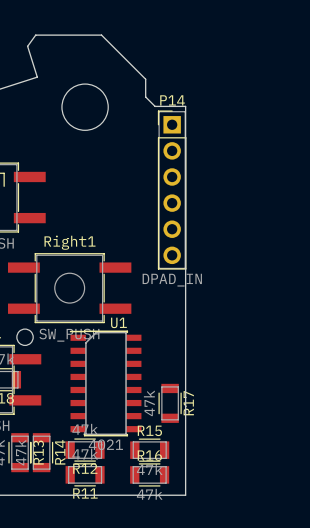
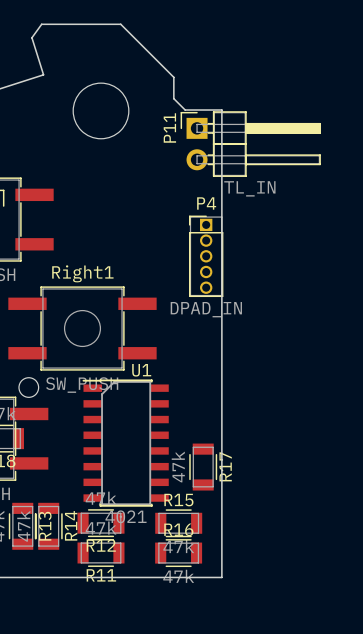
P11: none -> TL_IN (250, 144)
P14: DPAD_IN (172, 190) -> none
P4: none -> DPAD_IN (206, 256)

